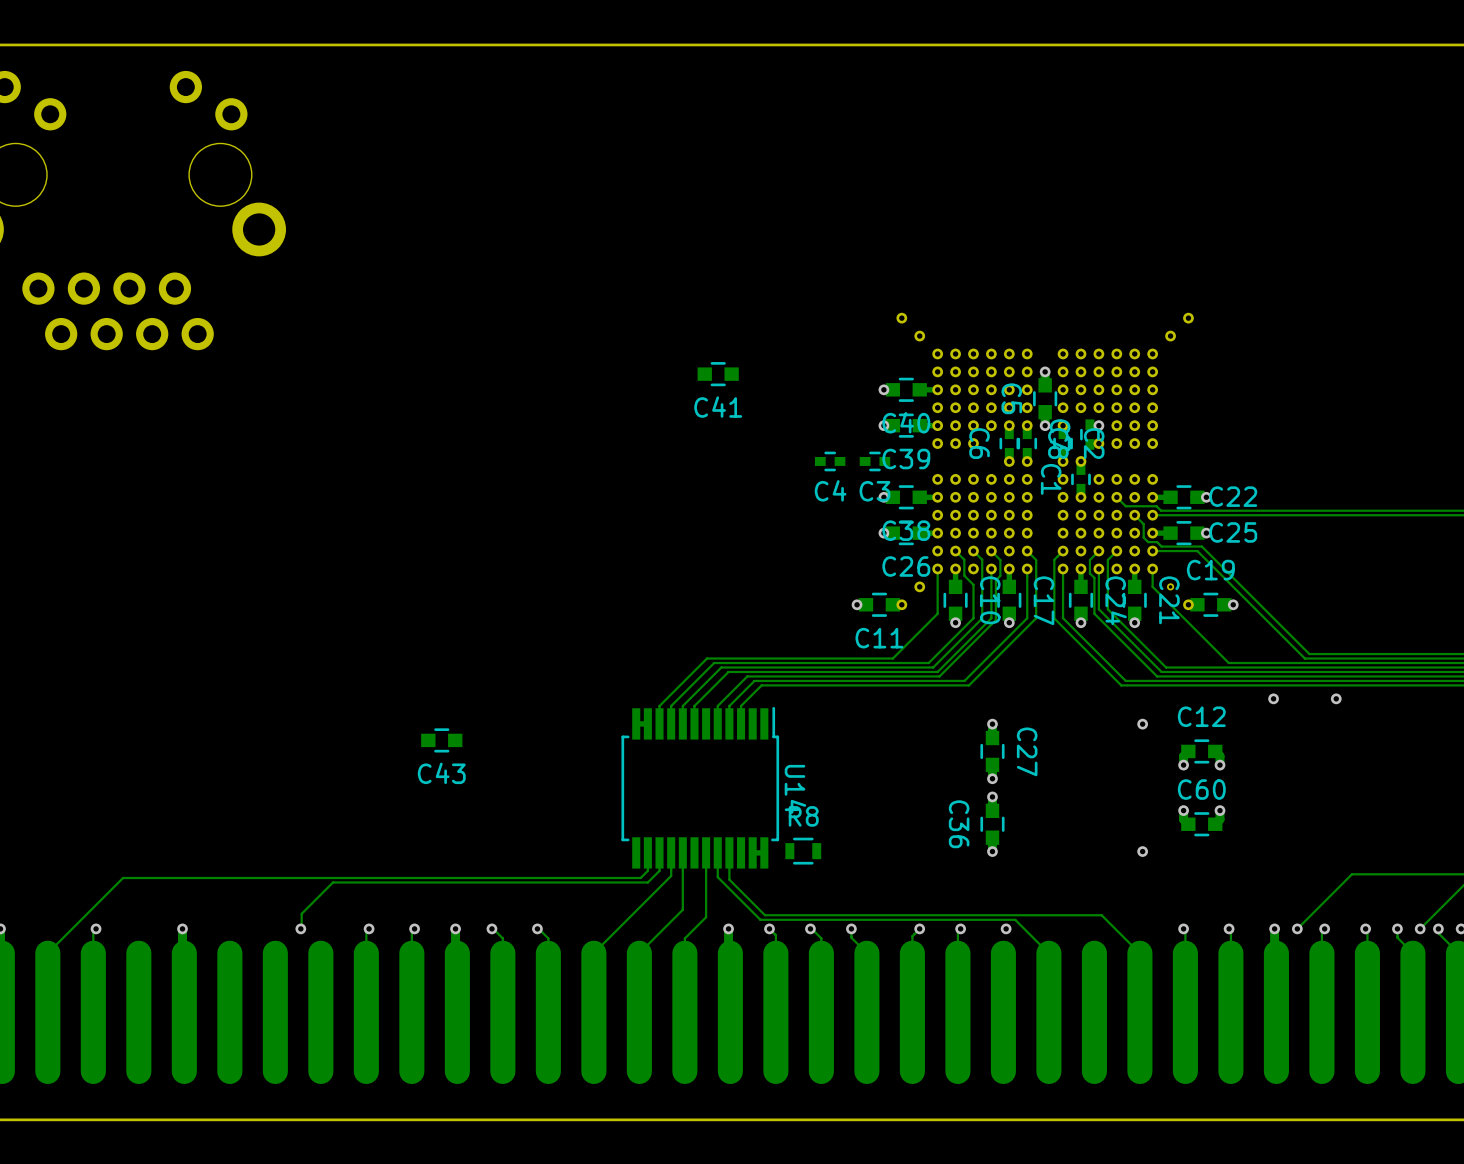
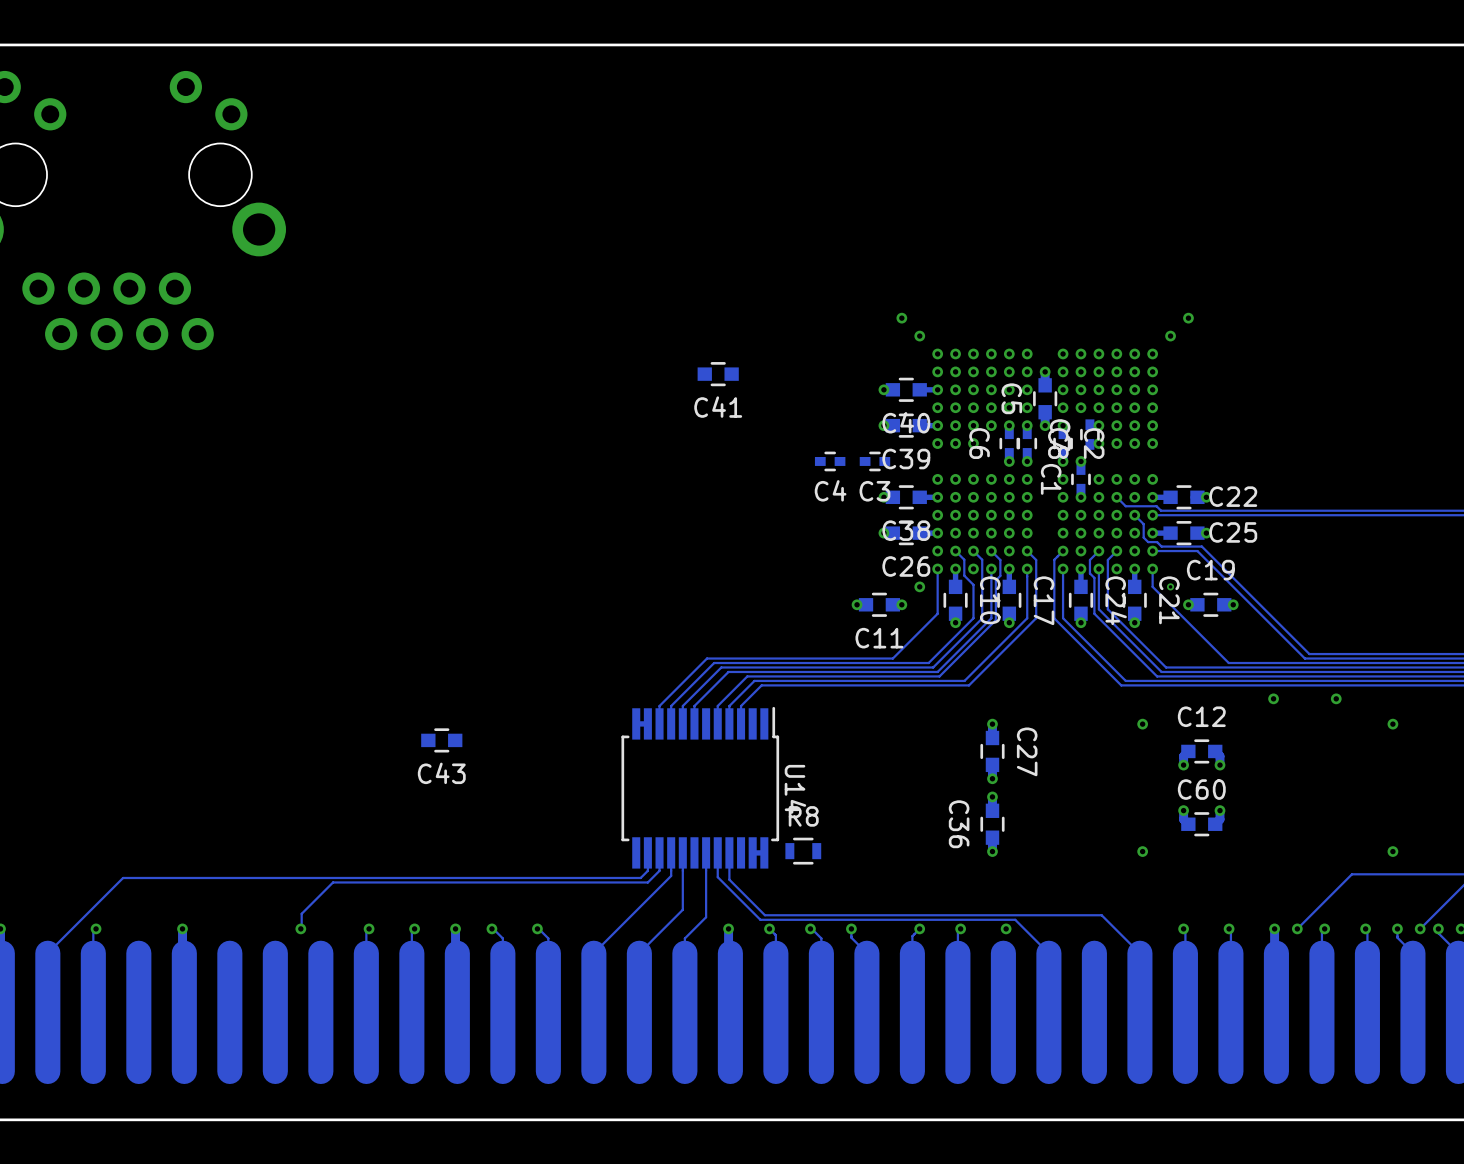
via: none -> (1392, 724)
via: none -> (1392, 851)

